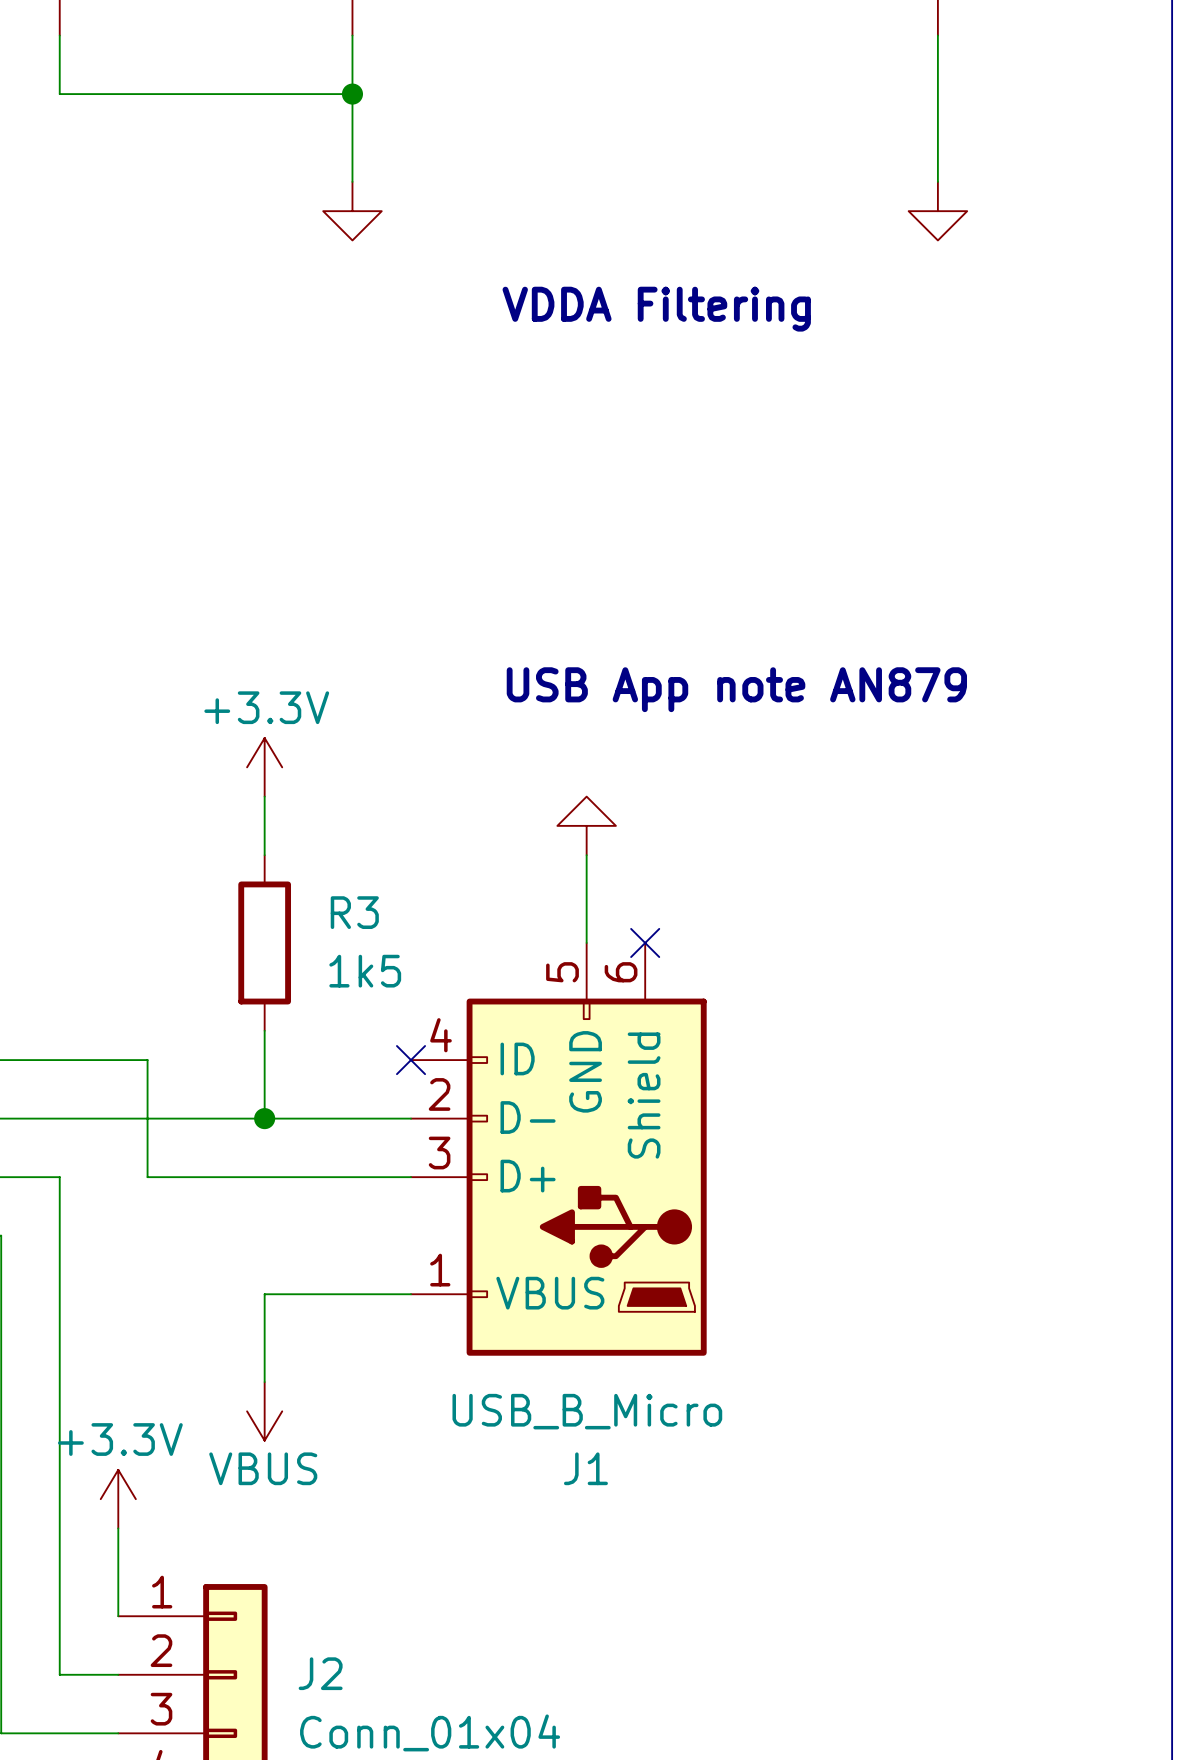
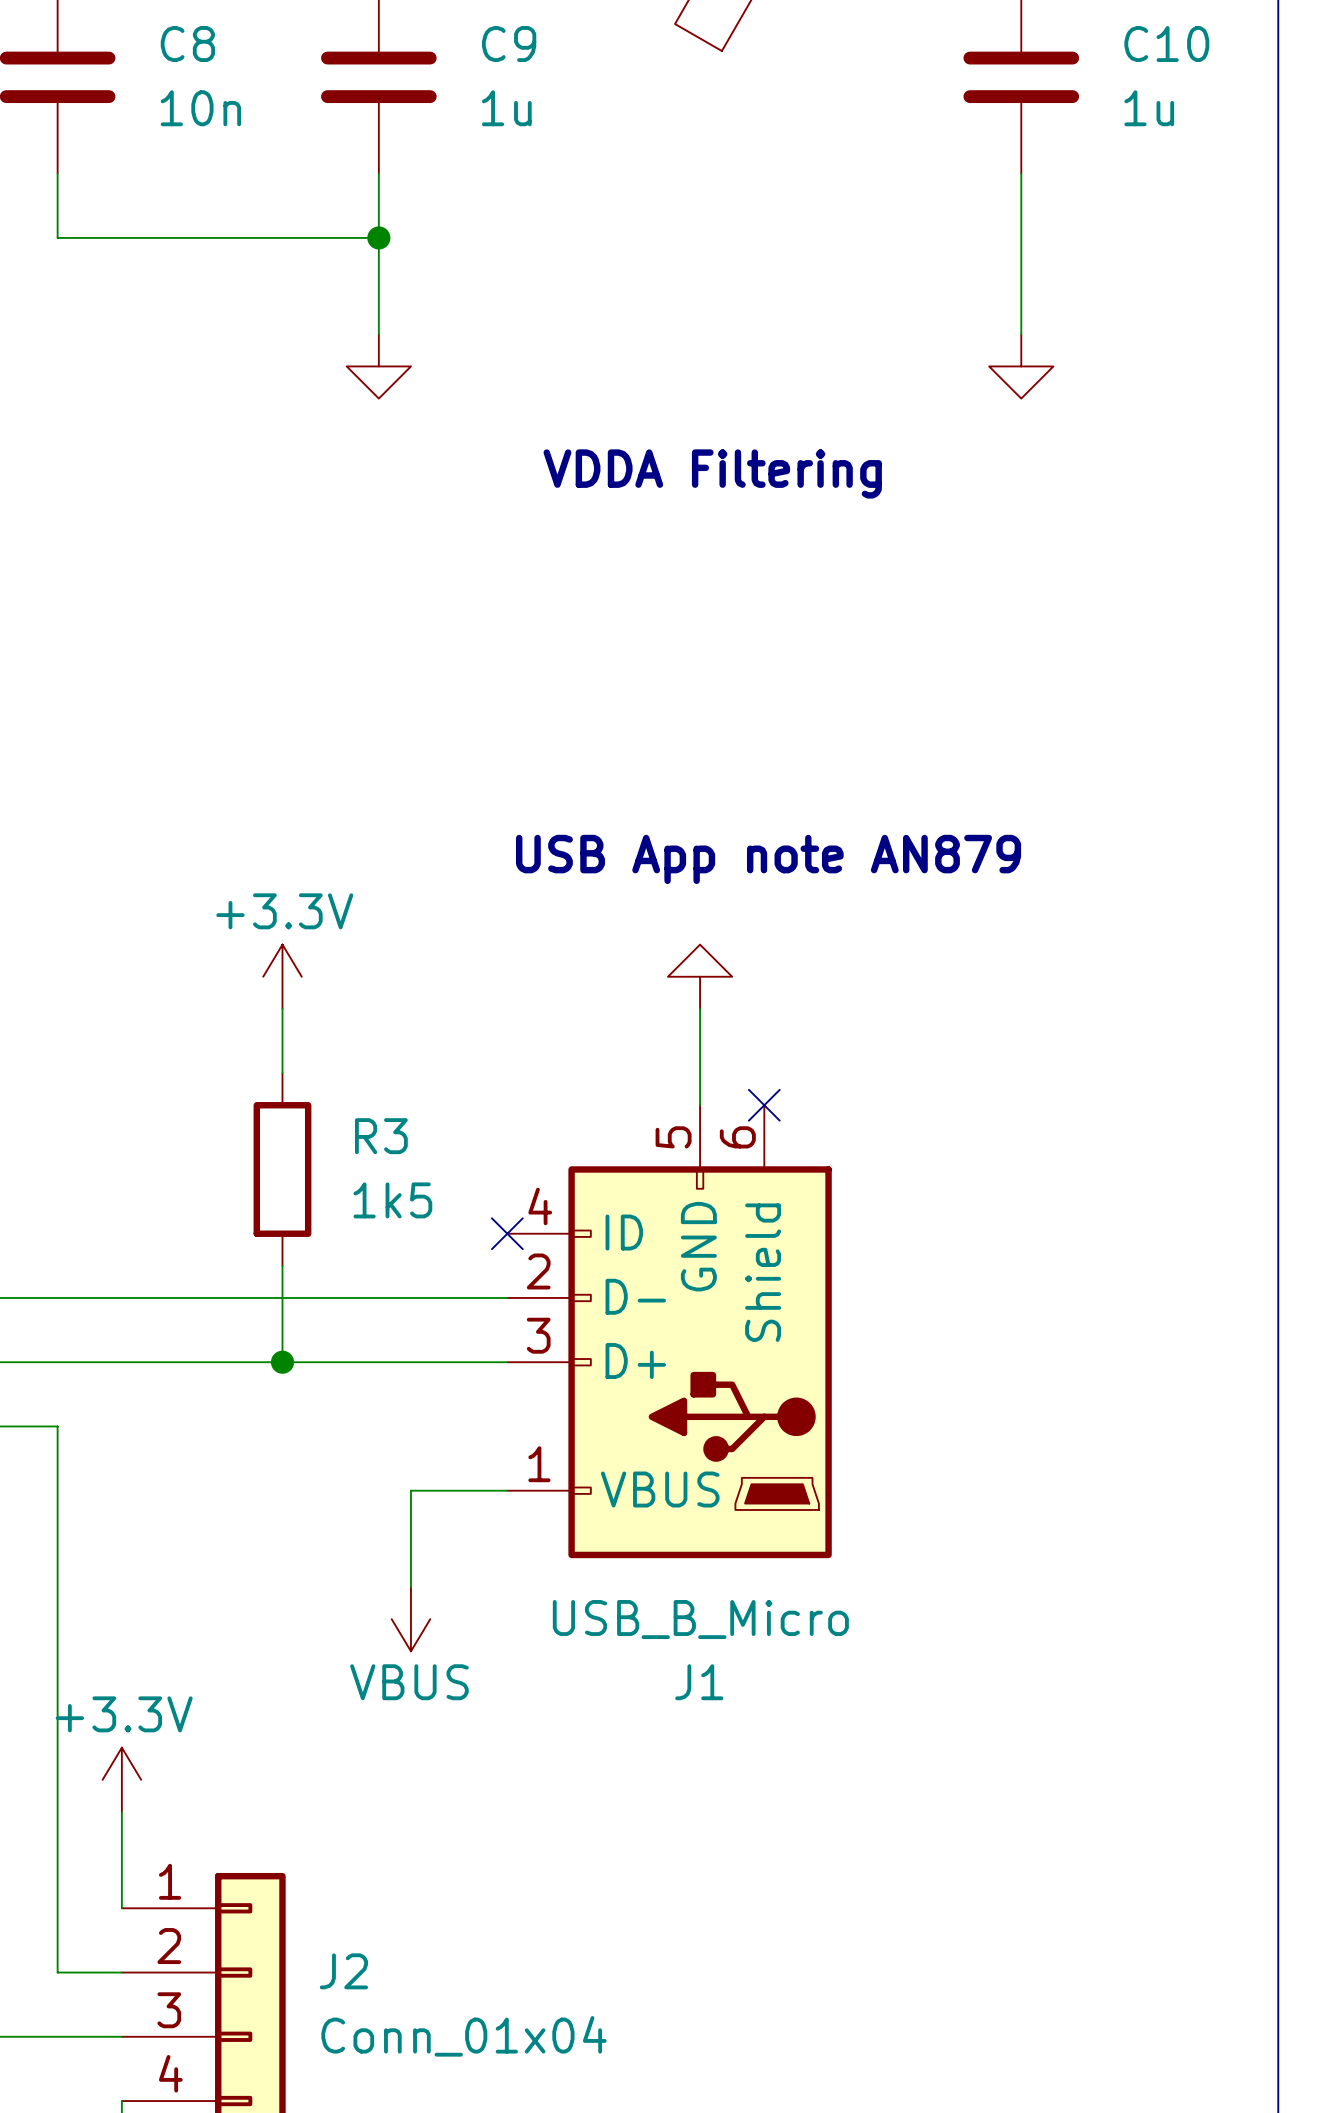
text position: USB App note AN879 (736, 689) -> USB App note AN879 (768, 859)
power symbol position: (586, 825) -> (700, 976)
wire: (586, 855) (586, 942) -> (700, 1008) (700, 1105)
no-connect mark position: (645, 942) -> (764, 1105)
wire: (147, 1060) (147, 1177) (411, 1177) -> (154, 1297) (507, 1297)
no-connect mark position: (411, 1060) -> (507, 1233)
J1 position: (558, 1149) -> (669, 1331)
wire: none -> (507, 1490) (410, 1490) (410, 1587)
wire: (411, 1294) (264, 1294) (264, 1382) -> none
power symbol position: VBUS (264, 1411) -> VBUS (410, 1619)

